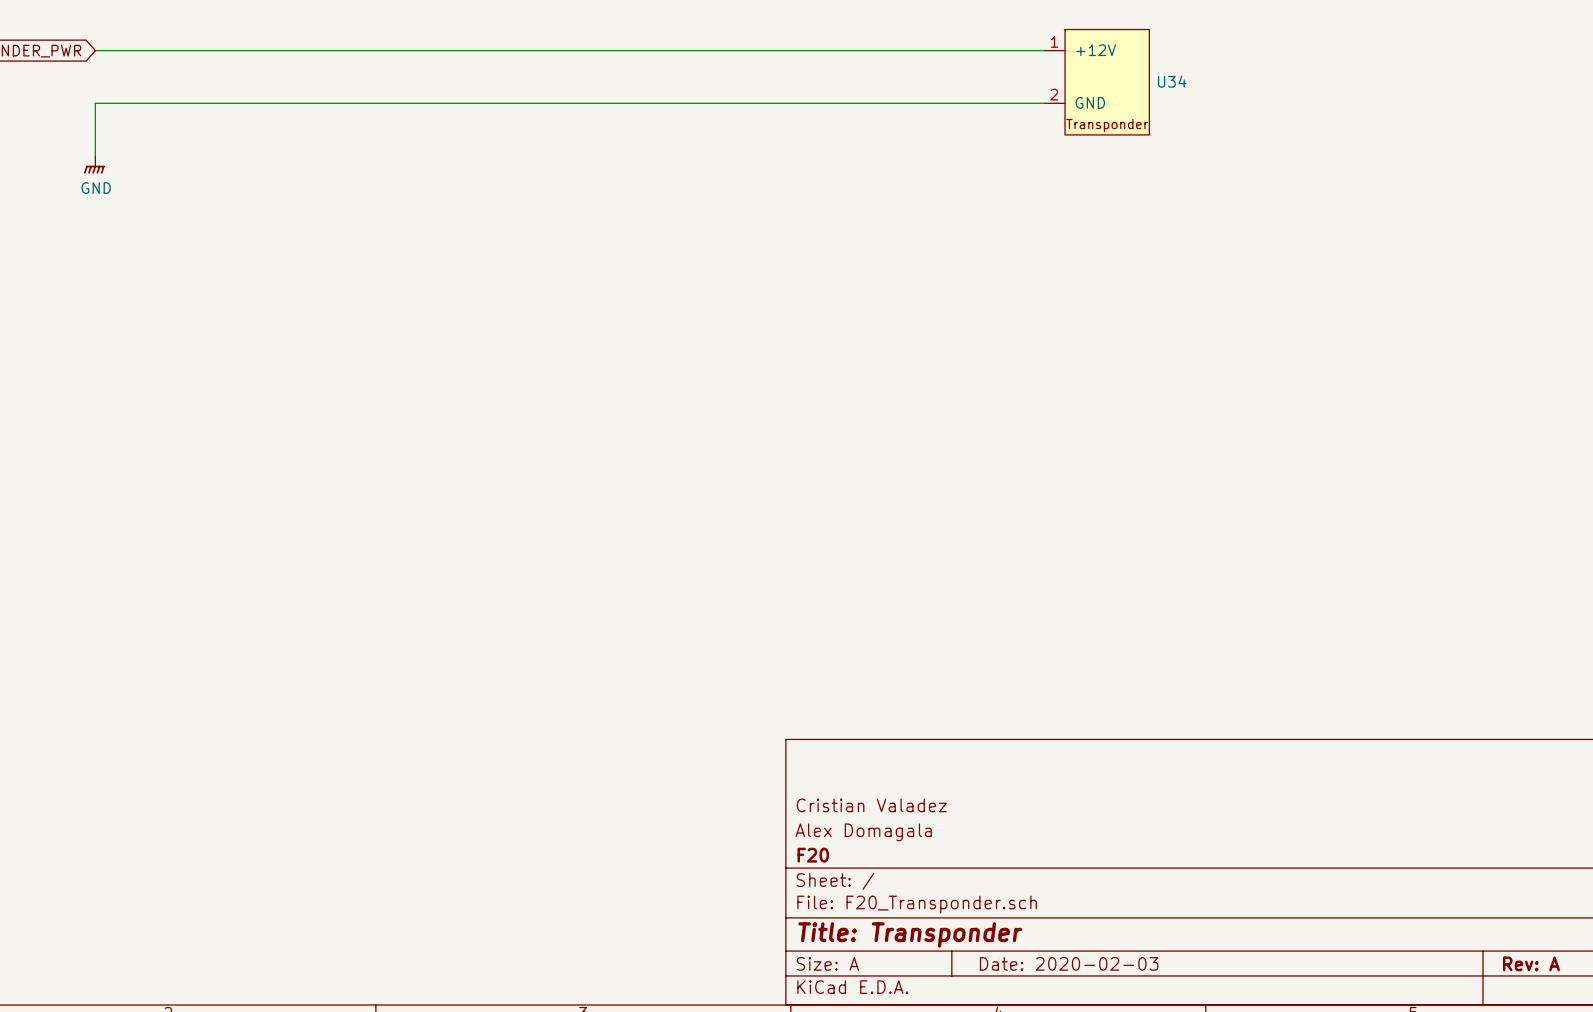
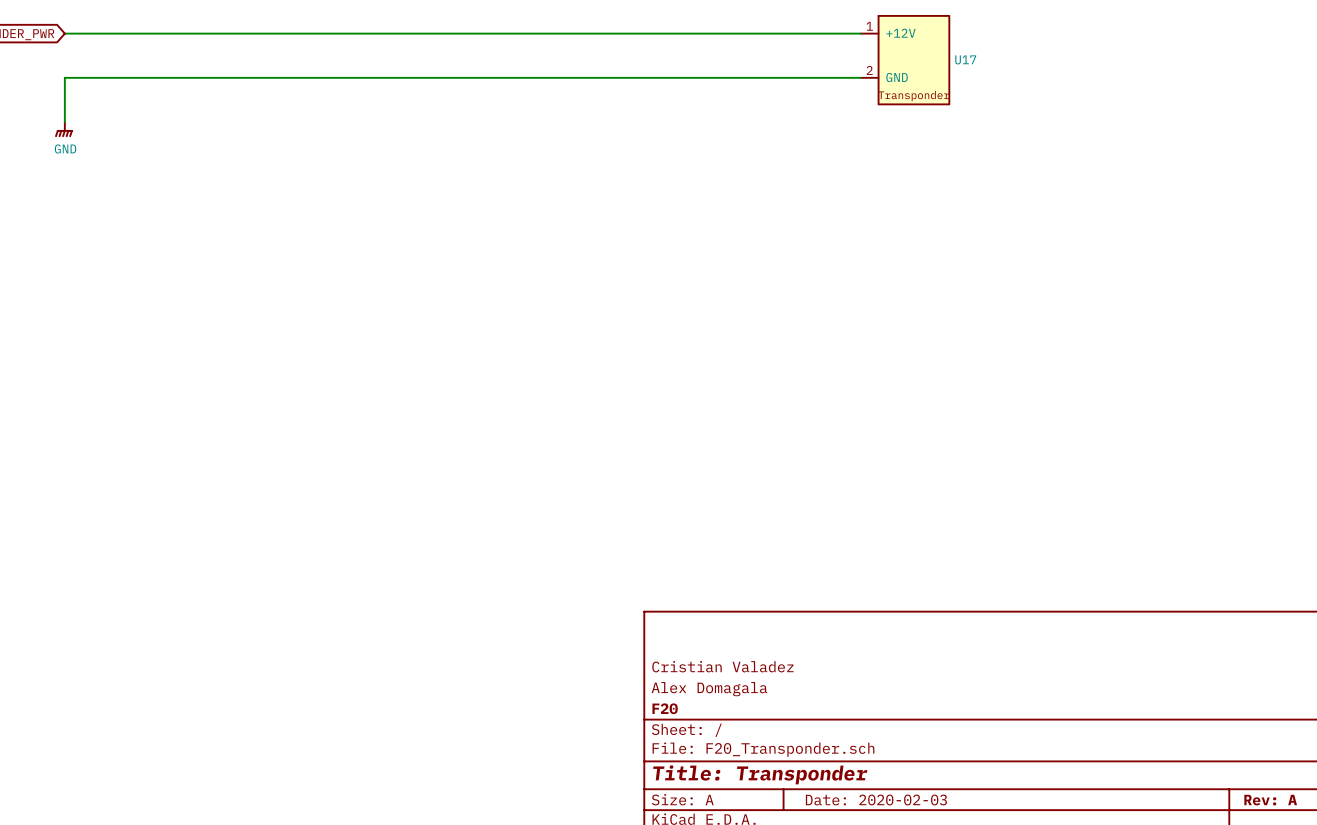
U34 name: U34 (1172, 81) -> U17 (965, 59)

